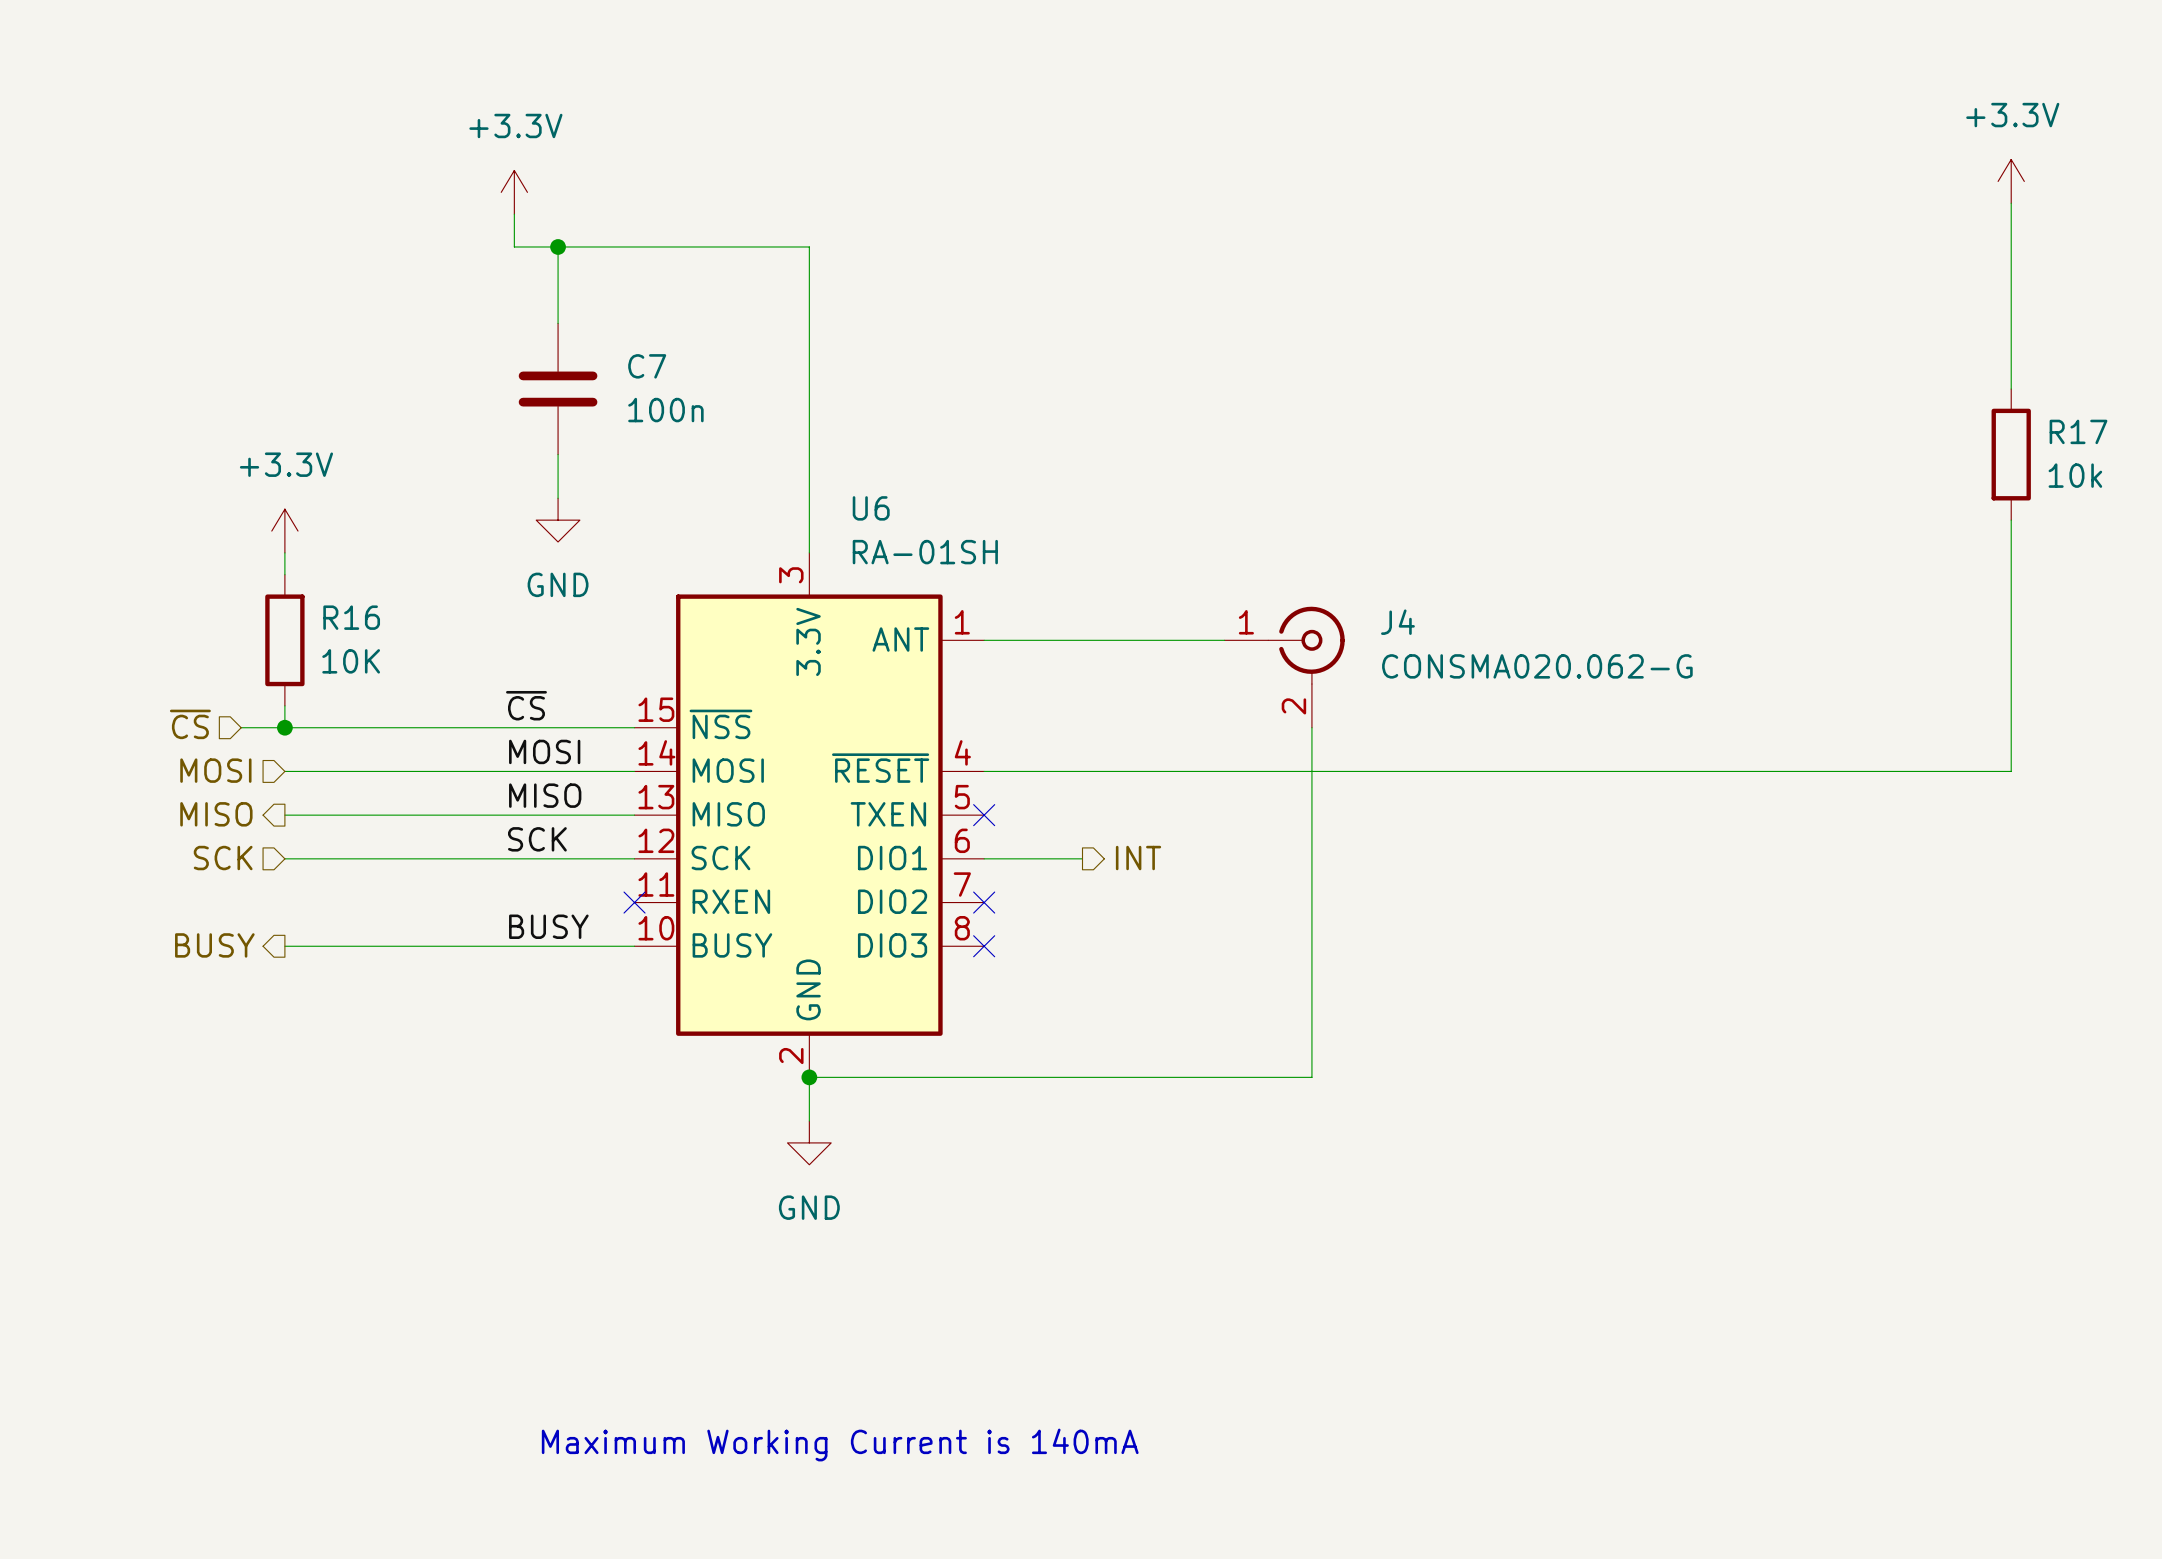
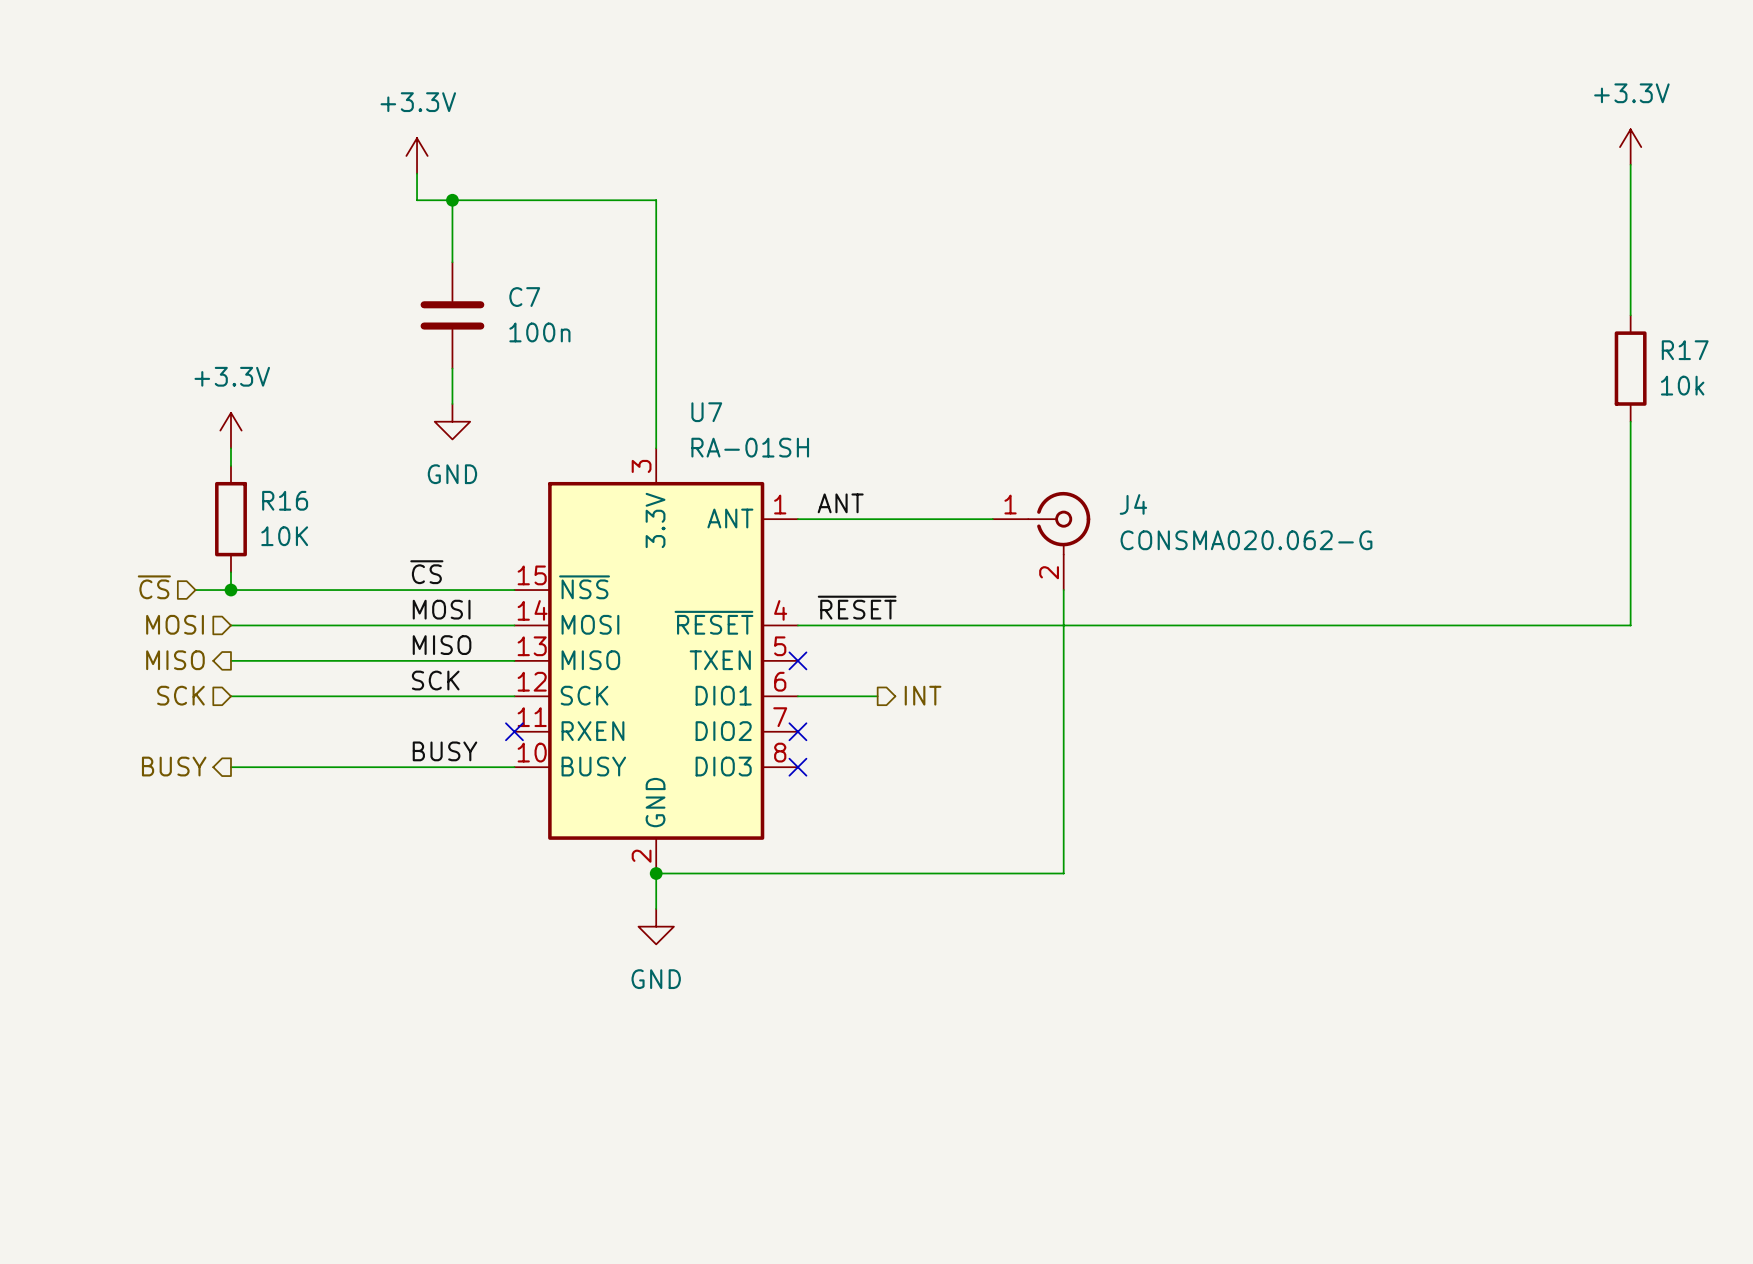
U6 name: U6 (871, 508) -> U7 (706, 412)
label: none -> ANT (840, 503)
label: none -> ~{RESET} (857, 607)
text: Maximum Working Current is 140mA (840, 1445) -> none

